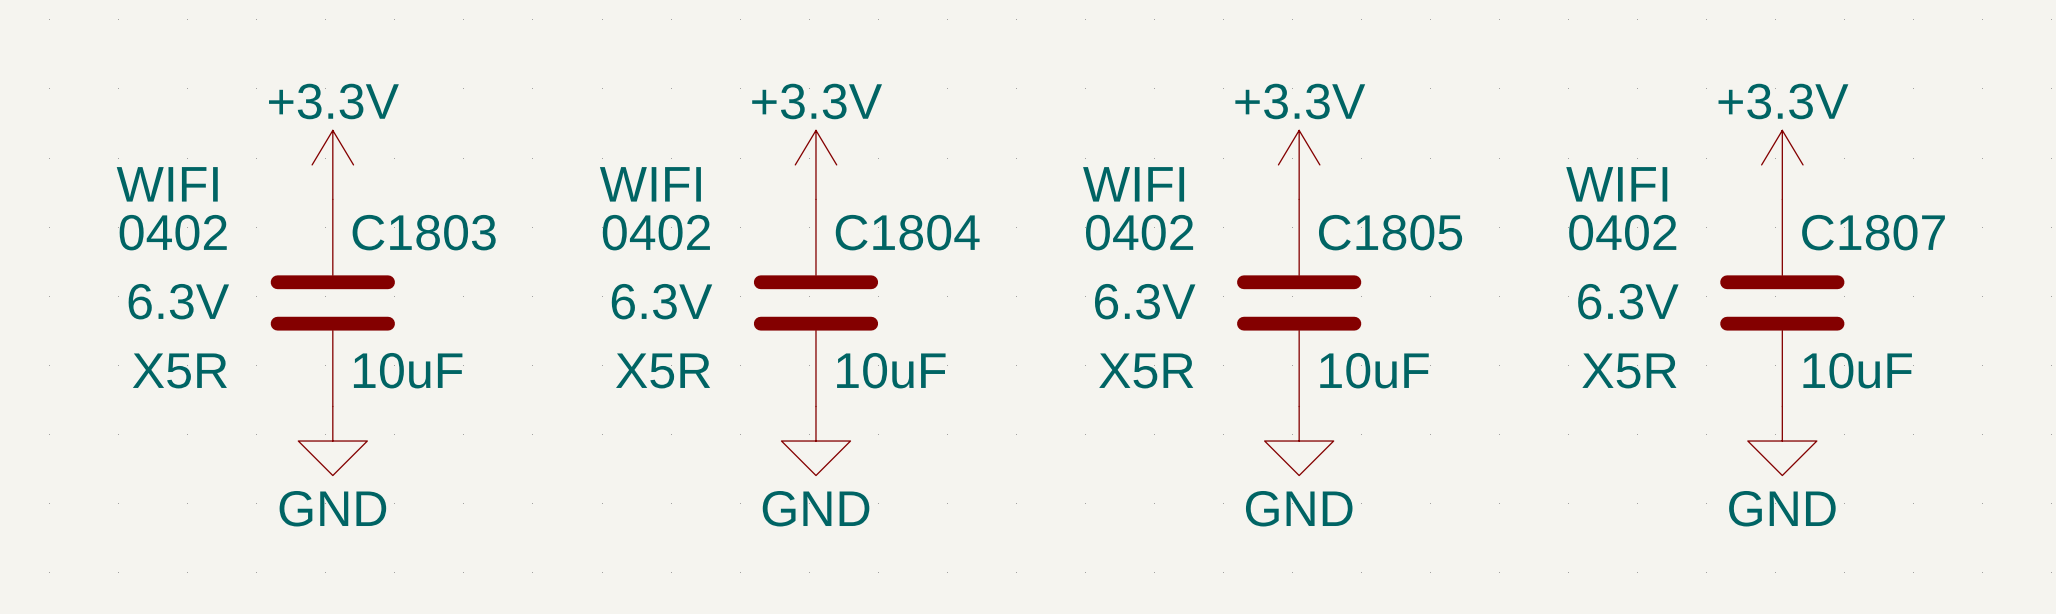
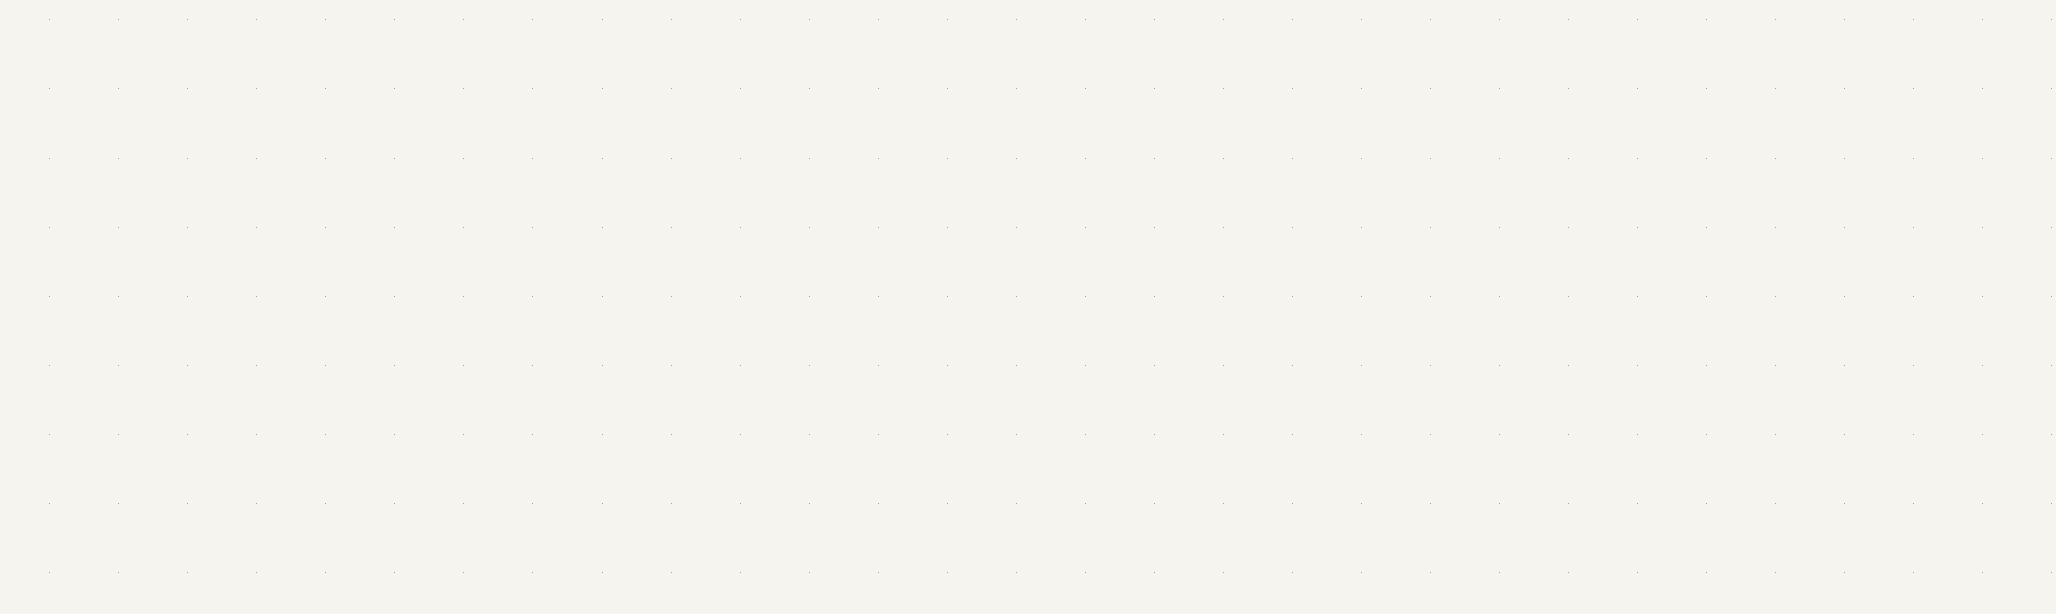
power symbol: +3.3V (332, 164) -> none
power symbol: +3.3V (815, 164) -> none
power symbol: +3.3V (1299, 164) -> none
power symbol: +3.3V (1782, 164) -> none
C1803: 10uF (332, 302) -> none
C1804: 10uF (815, 302) -> none
C1805: 10uF (1299, 302) -> none
C1807: 10uF (1782, 302) -> none
power symbol: GND (332, 441) -> none
power symbol: GND (815, 441) -> none
power symbol: GND (1299, 441) -> none
power symbol: GND (1782, 441) -> none

